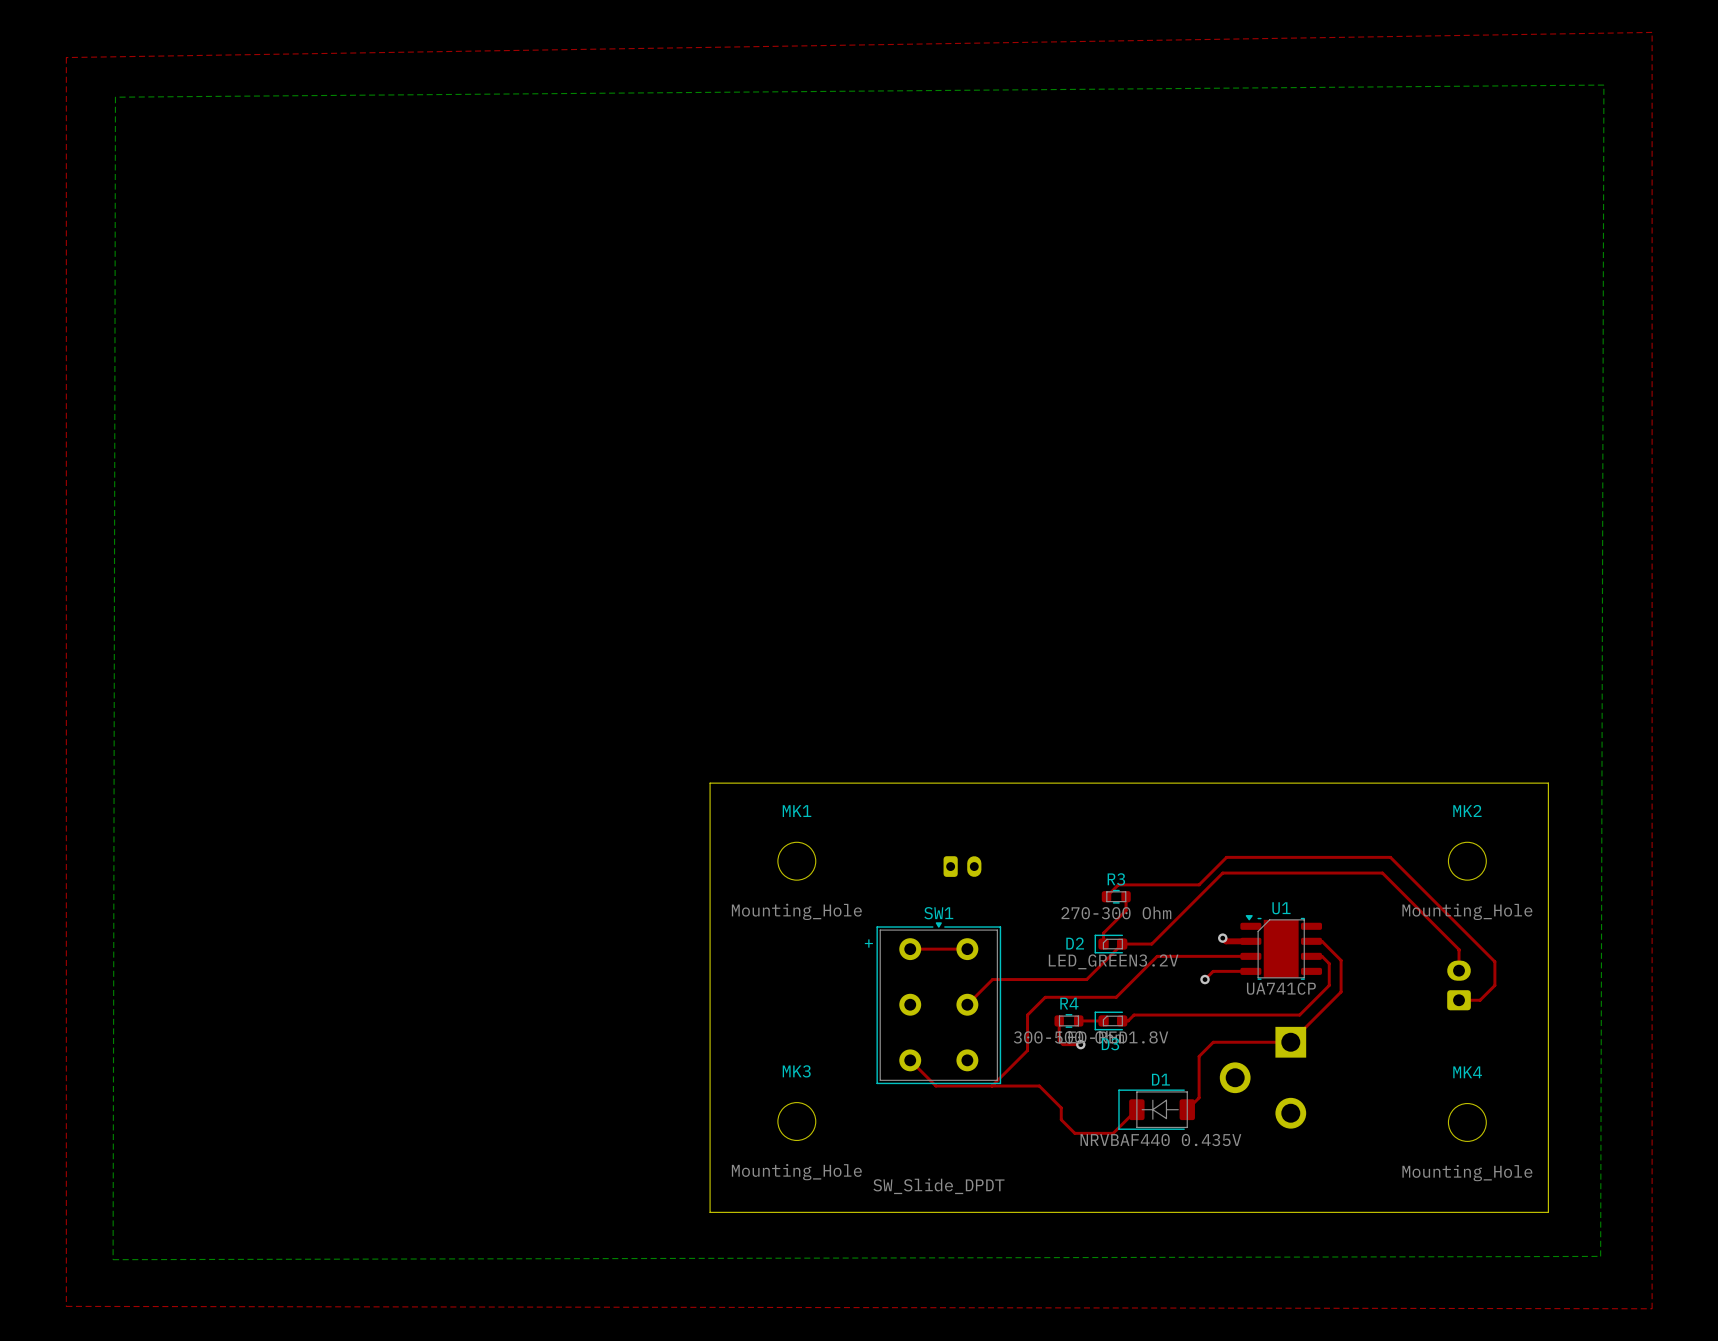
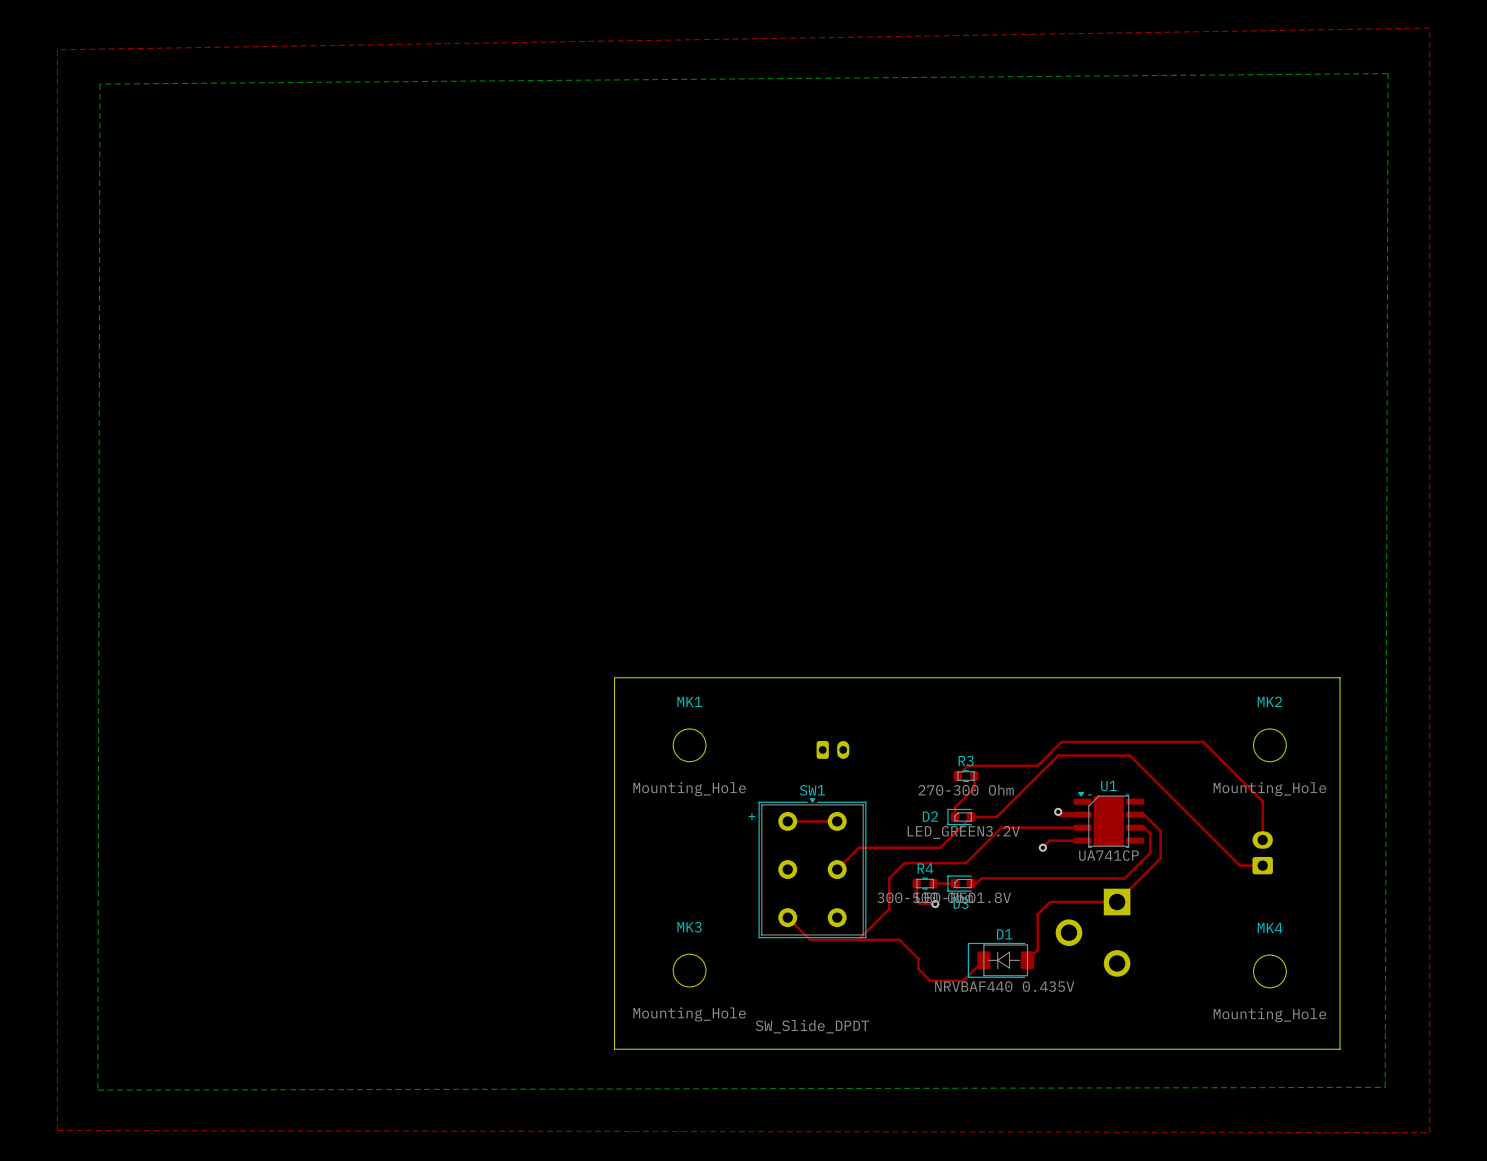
top track: (1305, 873) (1382, 873) (1459, 950) -> (1129, 755) (1239, 865) (1258, 865)
top track: (1459, 925) (1494, 961) (1494, 985) (1480, 1000) (1459, 1000) -> (1262, 801) (1262, 822)

